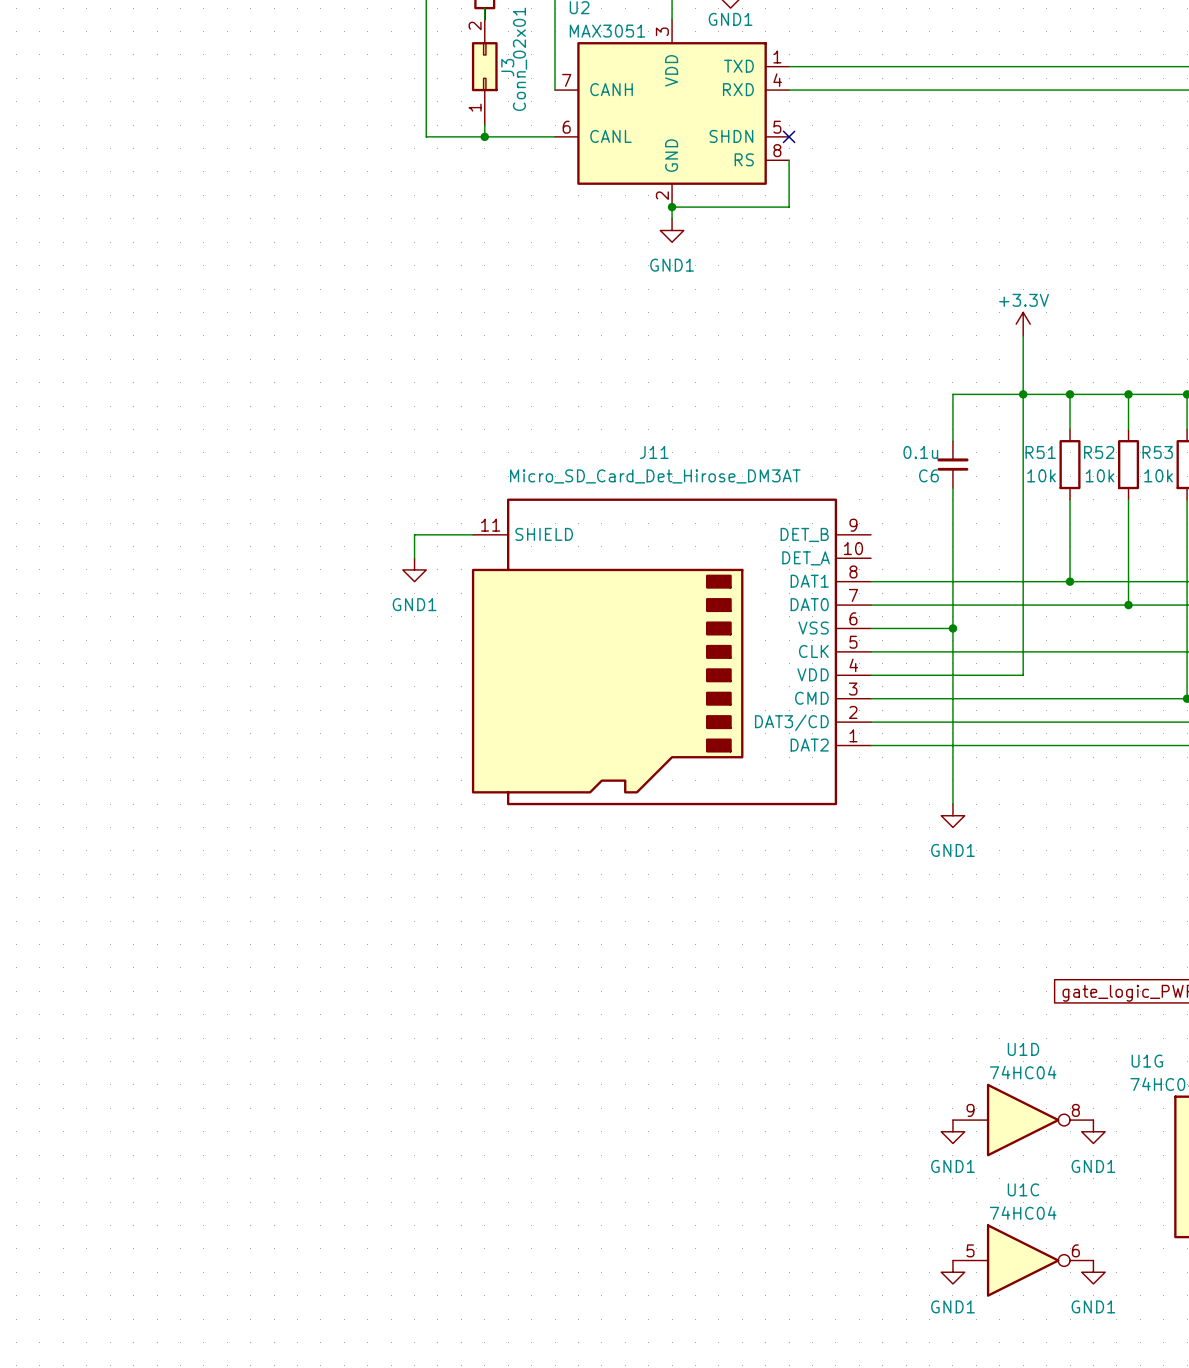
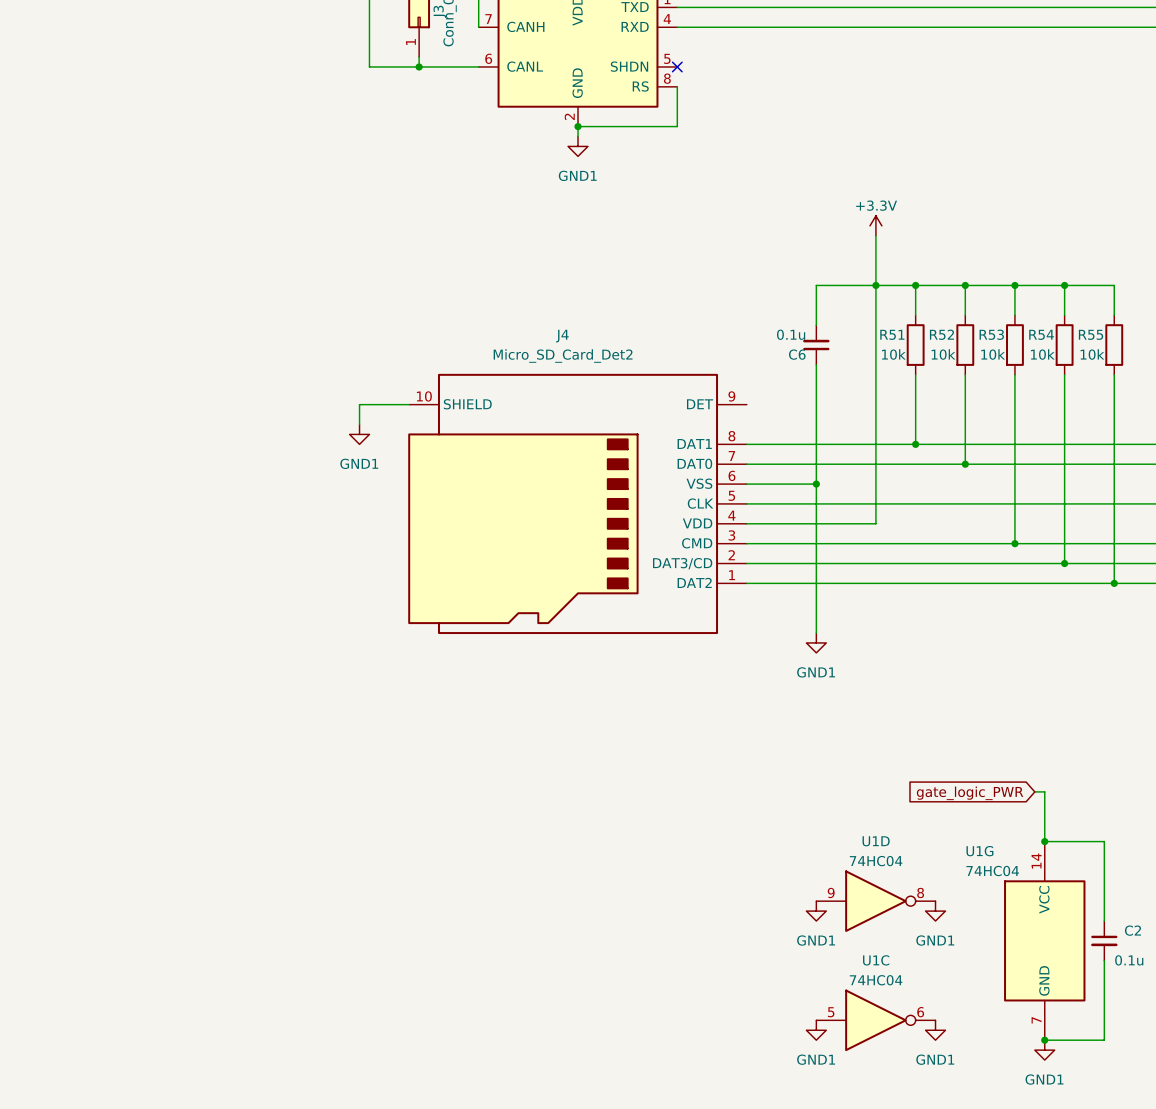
J11: Micro_SD_Card_Det_Hirose_DM3AT (671, 651) -> none
J4: none -> Micro_SD_Card_Det2 (577, 503)

